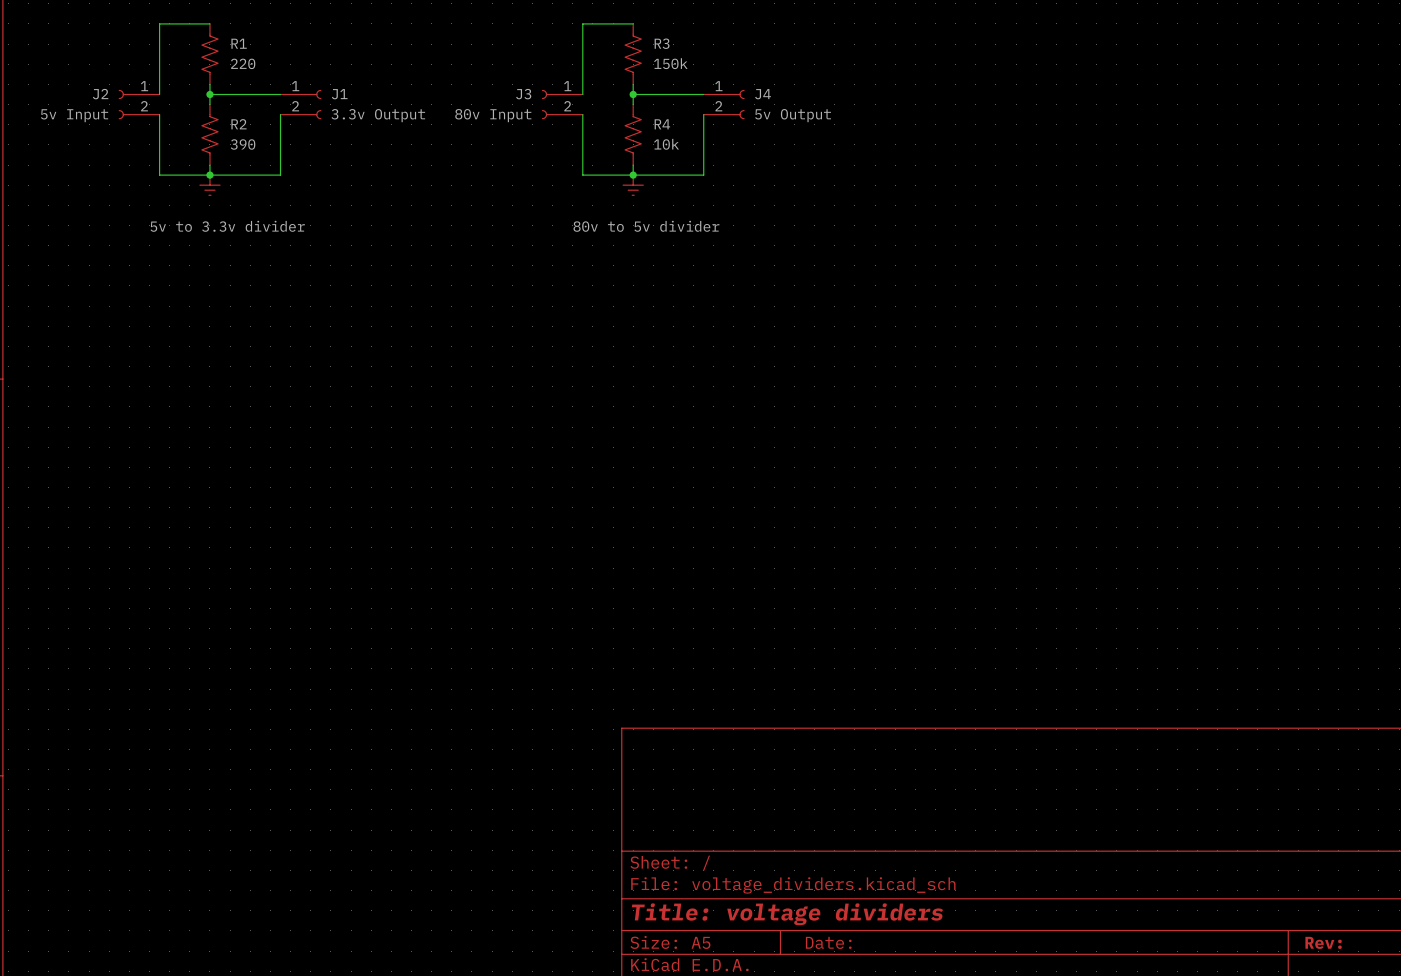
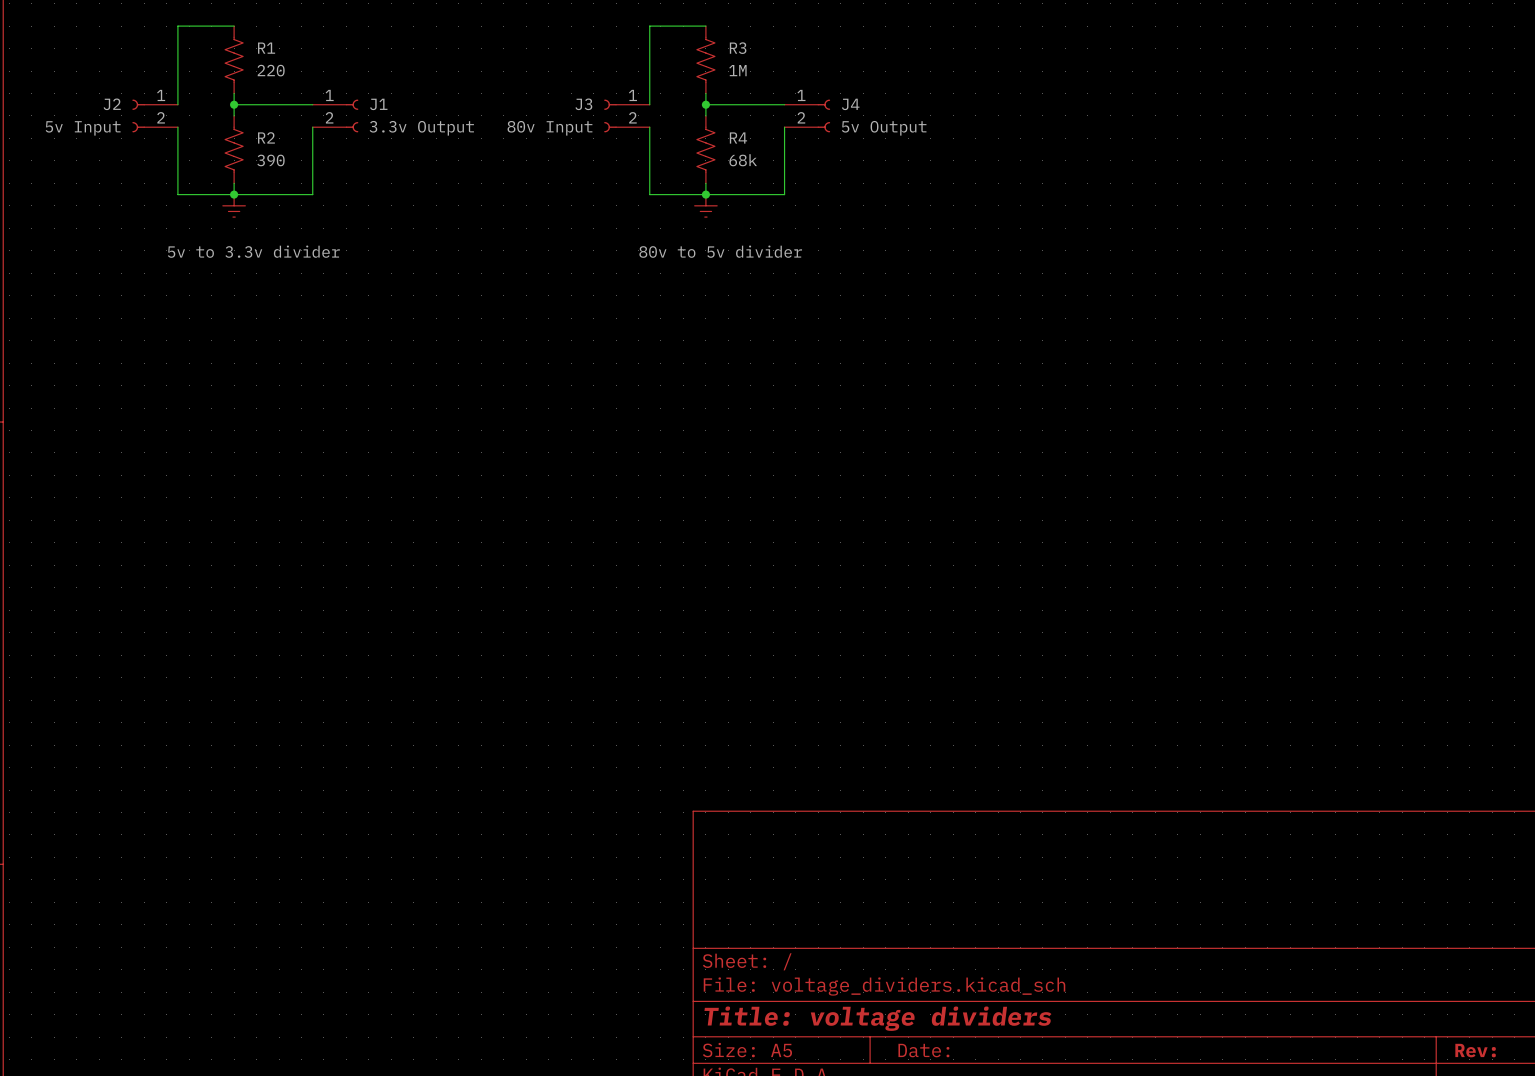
R3 value: 150k (670, 63) -> 1M (737, 70)
R4 value: 10k (666, 144) -> 68k (743, 160)

